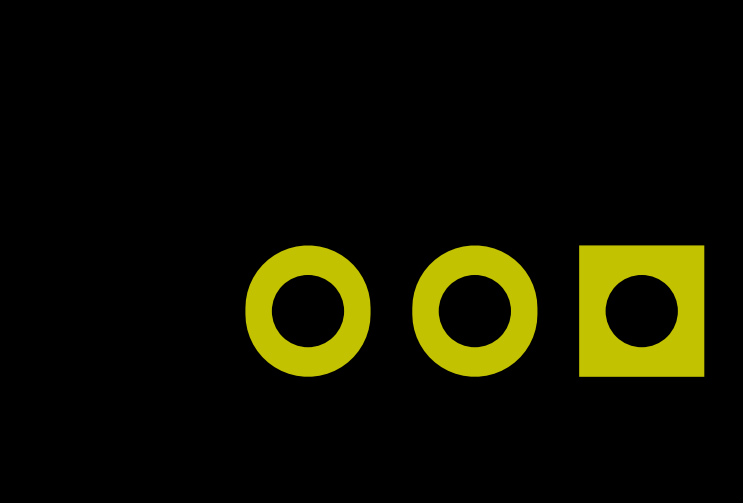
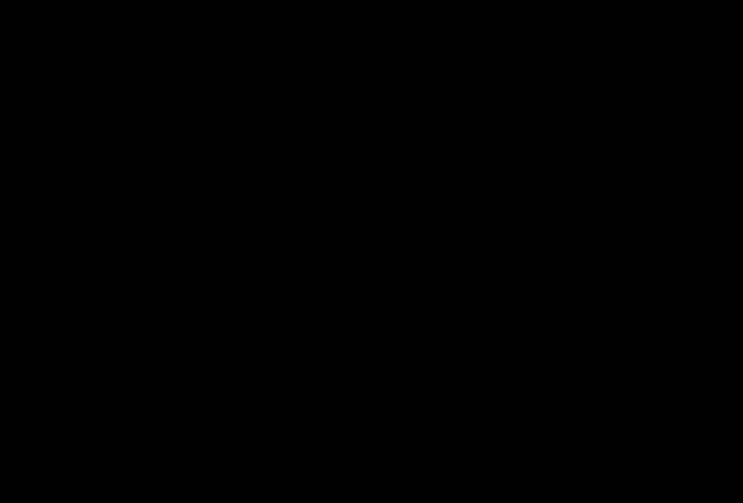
part: (474, 311) -> none

